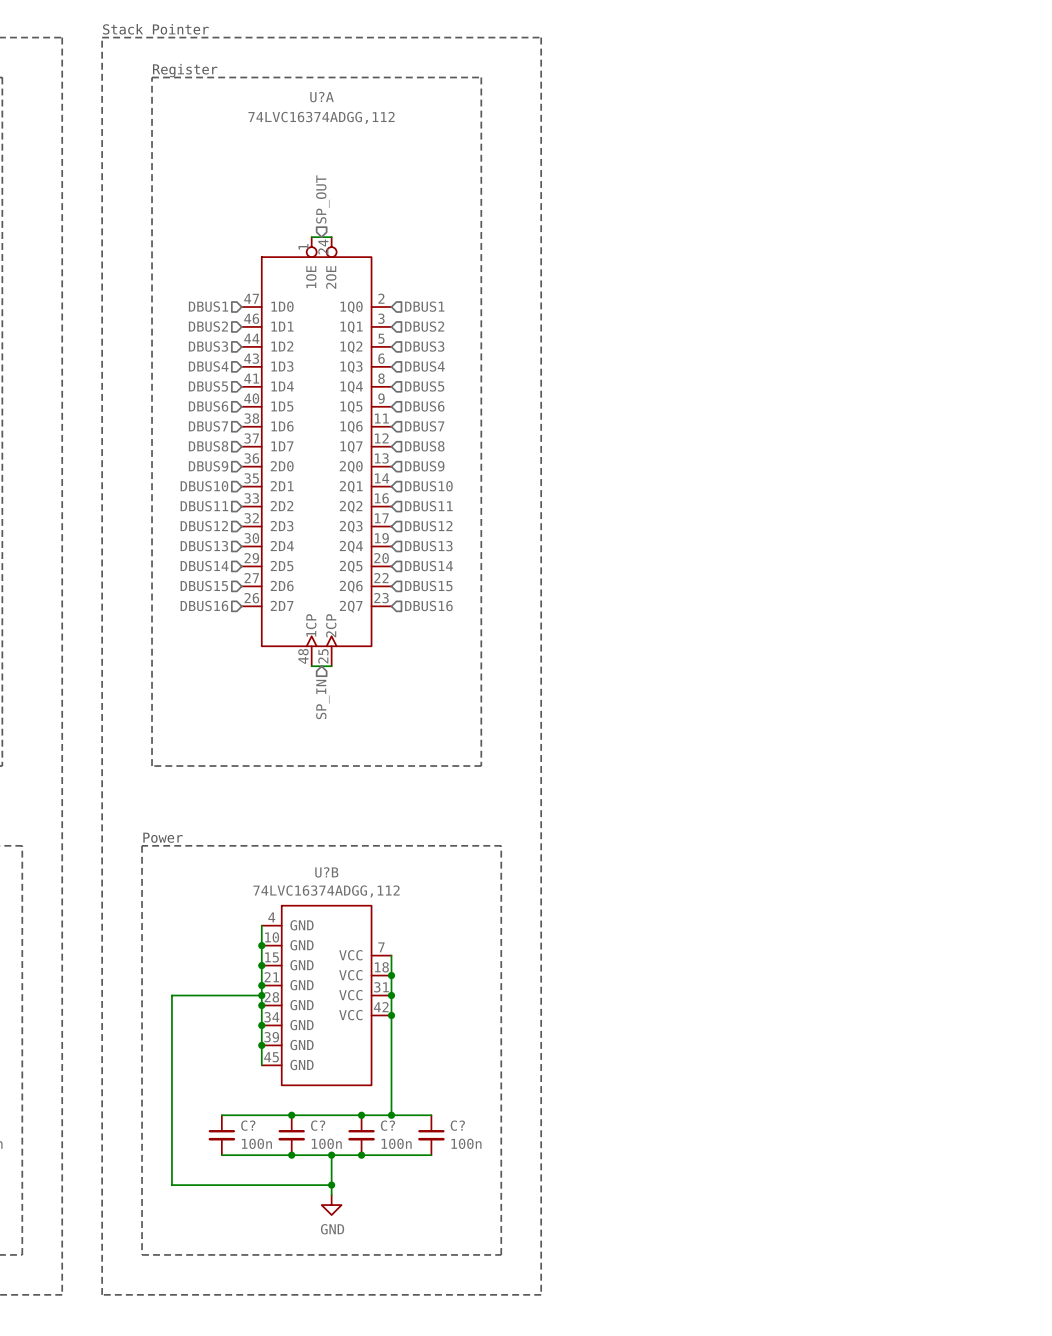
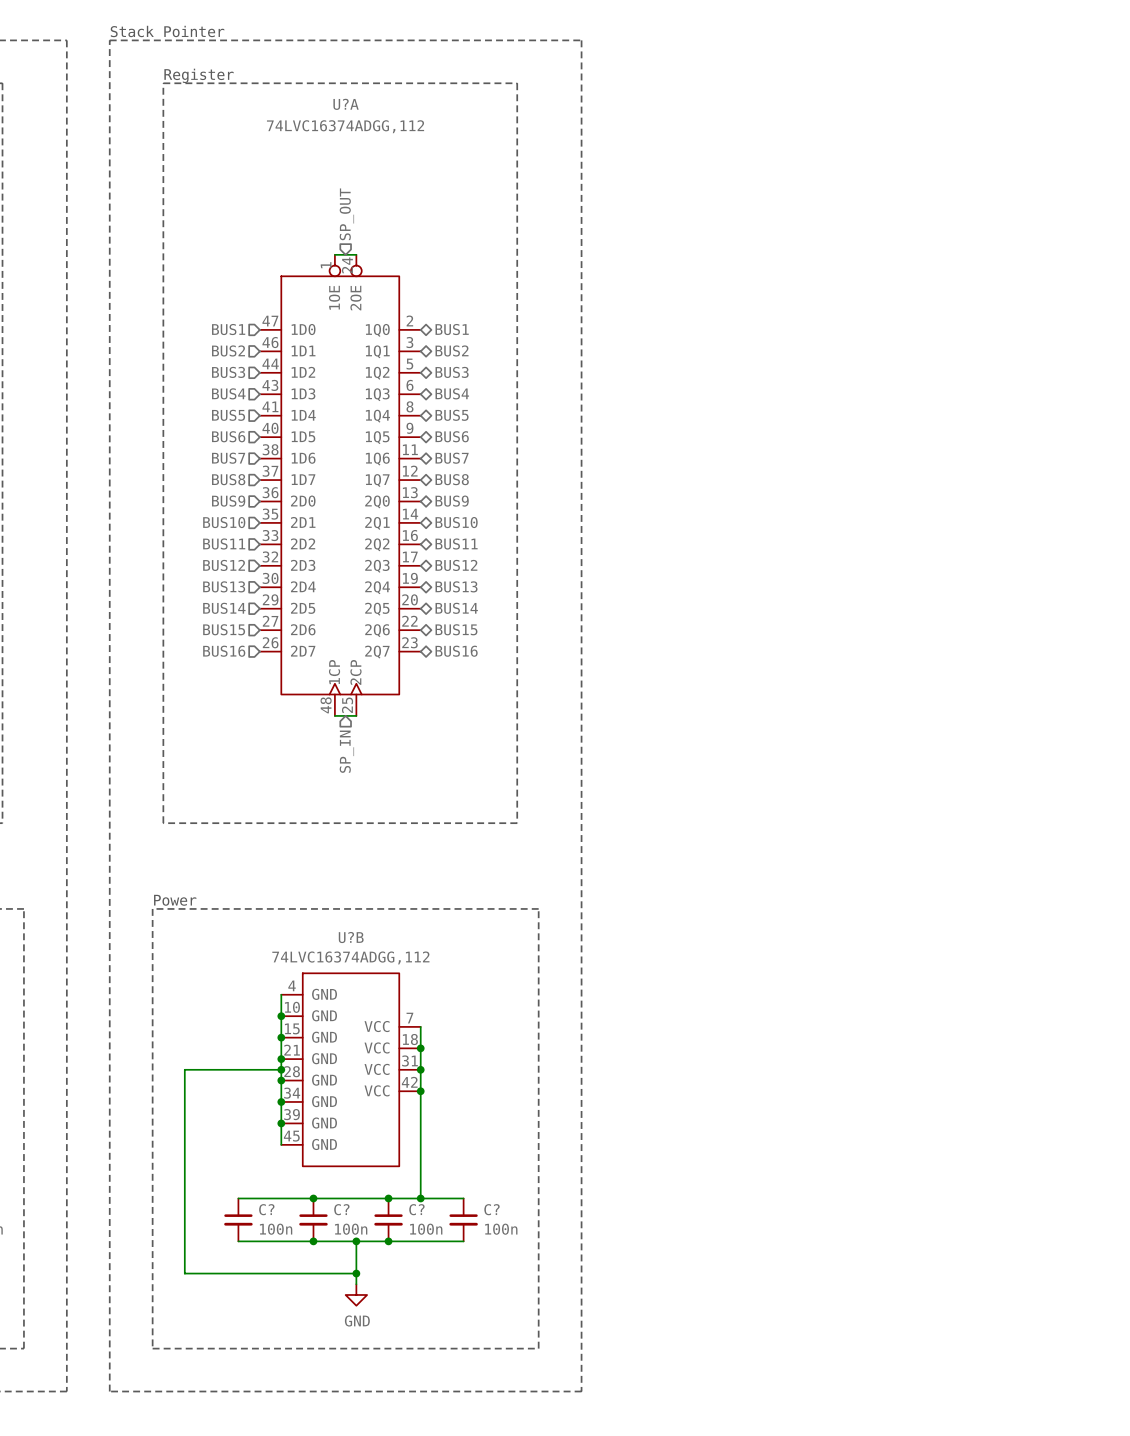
hierarchical label: DBUS1 (208, 306) -> BUS1 (228, 329)
hierarchical label shape: input (424, 306) -> bidirectional (452, 329)
hierarchical label: DBUS1 (424, 306) -> BUS1 (452, 329)
hierarchical label: DBUS2 (208, 326) -> BUS2 (228, 350)
hierarchical label shape: input (424, 326) -> bidirectional (452, 350)
hierarchical label: DBUS2 (424, 326) -> BUS2 (452, 350)
hierarchical label: DBUS3 (208, 346) -> BUS3 (228, 372)
hierarchical label shape: input (424, 346) -> bidirectional (452, 372)
hierarchical label: DBUS3 (424, 346) -> BUS3 (452, 372)
hierarchical label: DBUS4 (208, 366) -> BUS4 (228, 393)
hierarchical label shape: input (424, 366) -> bidirectional (452, 393)
hierarchical label: DBUS4 (424, 366) -> BUS4 (452, 393)
hierarchical label: DBUS5 (208, 386) -> BUS5 (228, 415)
hierarchical label shape: input (424, 386) -> bidirectional (452, 415)
hierarchical label: DBUS5 (424, 386) -> BUS5 (452, 415)
hierarchical label: DBUS6 (208, 406) -> BUS6 (228, 436)
hierarchical label shape: input (424, 406) -> bidirectional (452, 436)
hierarchical label: DBUS6 (424, 406) -> BUS6 (452, 436)
hierarchical label: DBUS7 (208, 426) -> BUS7 (228, 458)
hierarchical label shape: input (424, 426) -> bidirectional (452, 458)
hierarchical label: DBUS7 (424, 426) -> BUS7 (452, 458)
hierarchical label: DBUS8 (208, 446) -> BUS8 (228, 479)
hierarchical label shape: input (424, 446) -> bidirectional (452, 479)
hierarchical label: DBUS8 (424, 446) -> BUS8 (452, 479)
hierarchical label: DBUS9 (208, 466) -> BUS9 (228, 501)
hierarchical label shape: input (424, 466) -> bidirectional (452, 501)
hierarchical label: DBUS9 (424, 466) -> BUS9 (452, 501)
hierarchical label: DBUS10 (204, 486) -> BUS10 (224, 522)
hierarchical label shape: input (428, 486) -> bidirectional (456, 522)
hierarchical label: DBUS10 (428, 486) -> BUS10 (456, 522)
hierarchical label: DBUS11 (204, 506) -> BUS11 (224, 543)
hierarchical label shape: input (428, 506) -> bidirectional (456, 543)
hierarchical label: DBUS11 (428, 506) -> BUS11 (456, 543)
hierarchical label: DBUS12 (204, 526) -> BUS12 (224, 565)
hierarchical label shape: input (428, 526) -> bidirectional (456, 565)
hierarchical label: DBUS12 (428, 526) -> BUS12 (456, 565)
hierarchical label: DBUS13 (204, 546) -> BUS13 (224, 586)
hierarchical label shape: input (428, 546) -> bidirectional (456, 586)
hierarchical label: DBUS13 (428, 546) -> BUS13 (456, 586)
hierarchical label: DBUS14 (204, 566) -> BUS14 (224, 608)
hierarchical label shape: input (429, 566) -> bidirectional (456, 608)
hierarchical label: DBUS14 (429, 566) -> BUS14 (456, 608)
hierarchical label: DBUS15 (204, 586) -> BUS15 (224, 629)
hierarchical label shape: input (428, 586) -> bidirectional (456, 629)
hierarchical label: DBUS15 (428, 586) -> BUS15 (456, 629)
hierarchical label: DBUS16 (204, 605) -> BUS16 (224, 651)
hierarchical label shape: input (428, 605) -> bidirectional (456, 651)
hierarchical label: DBUS16 (428, 605) -> BUS16 (456, 651)

